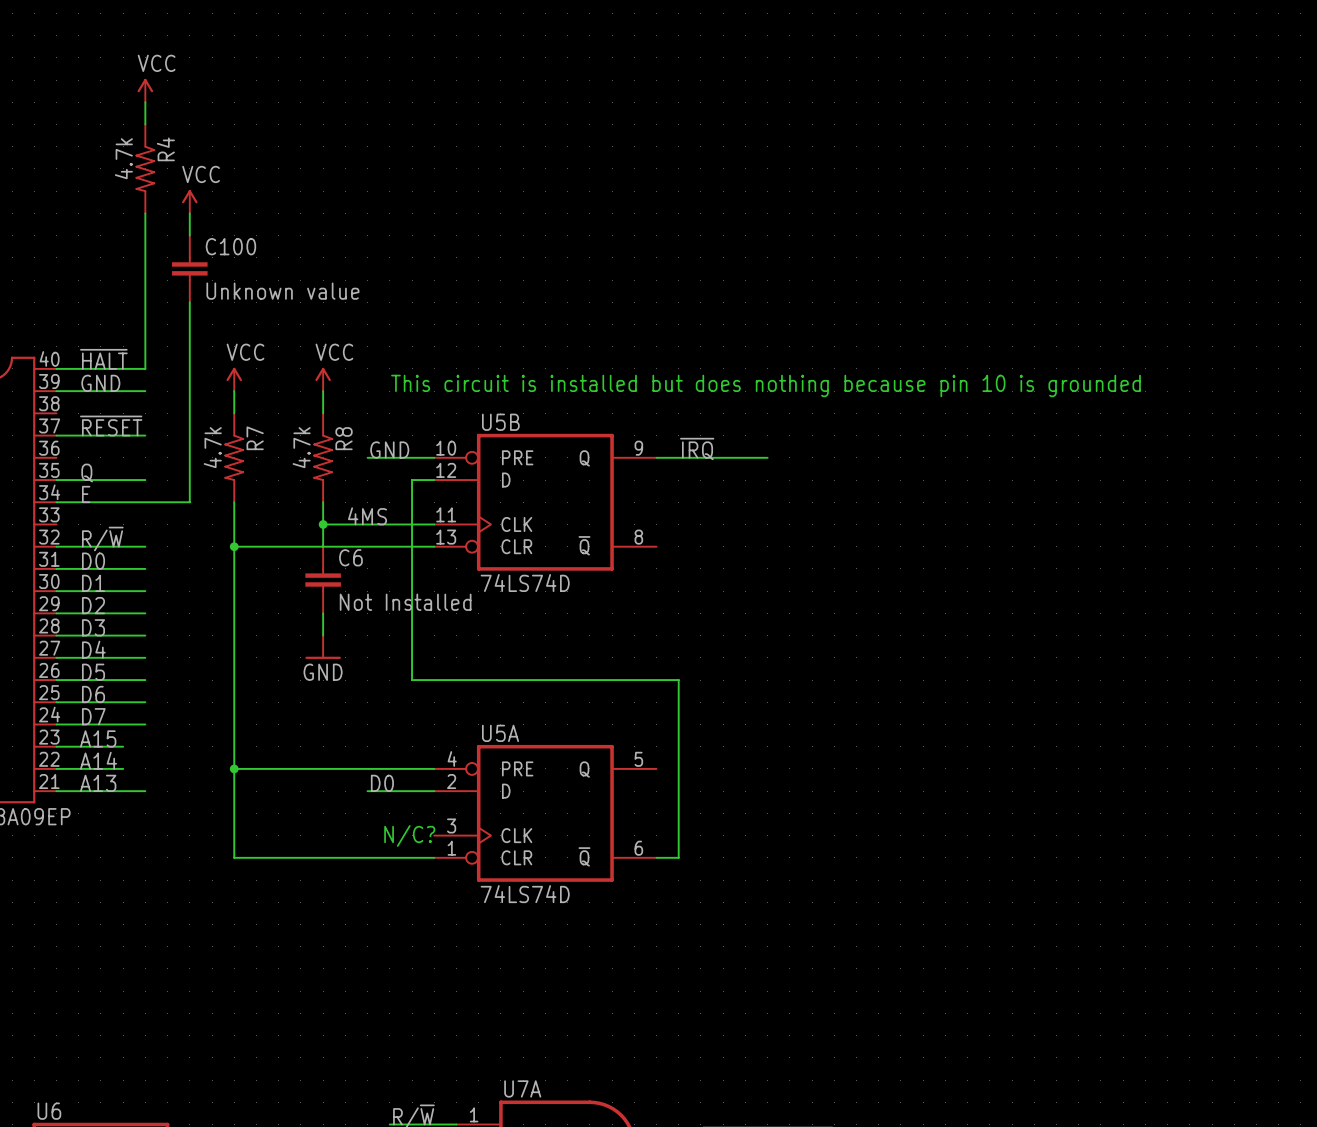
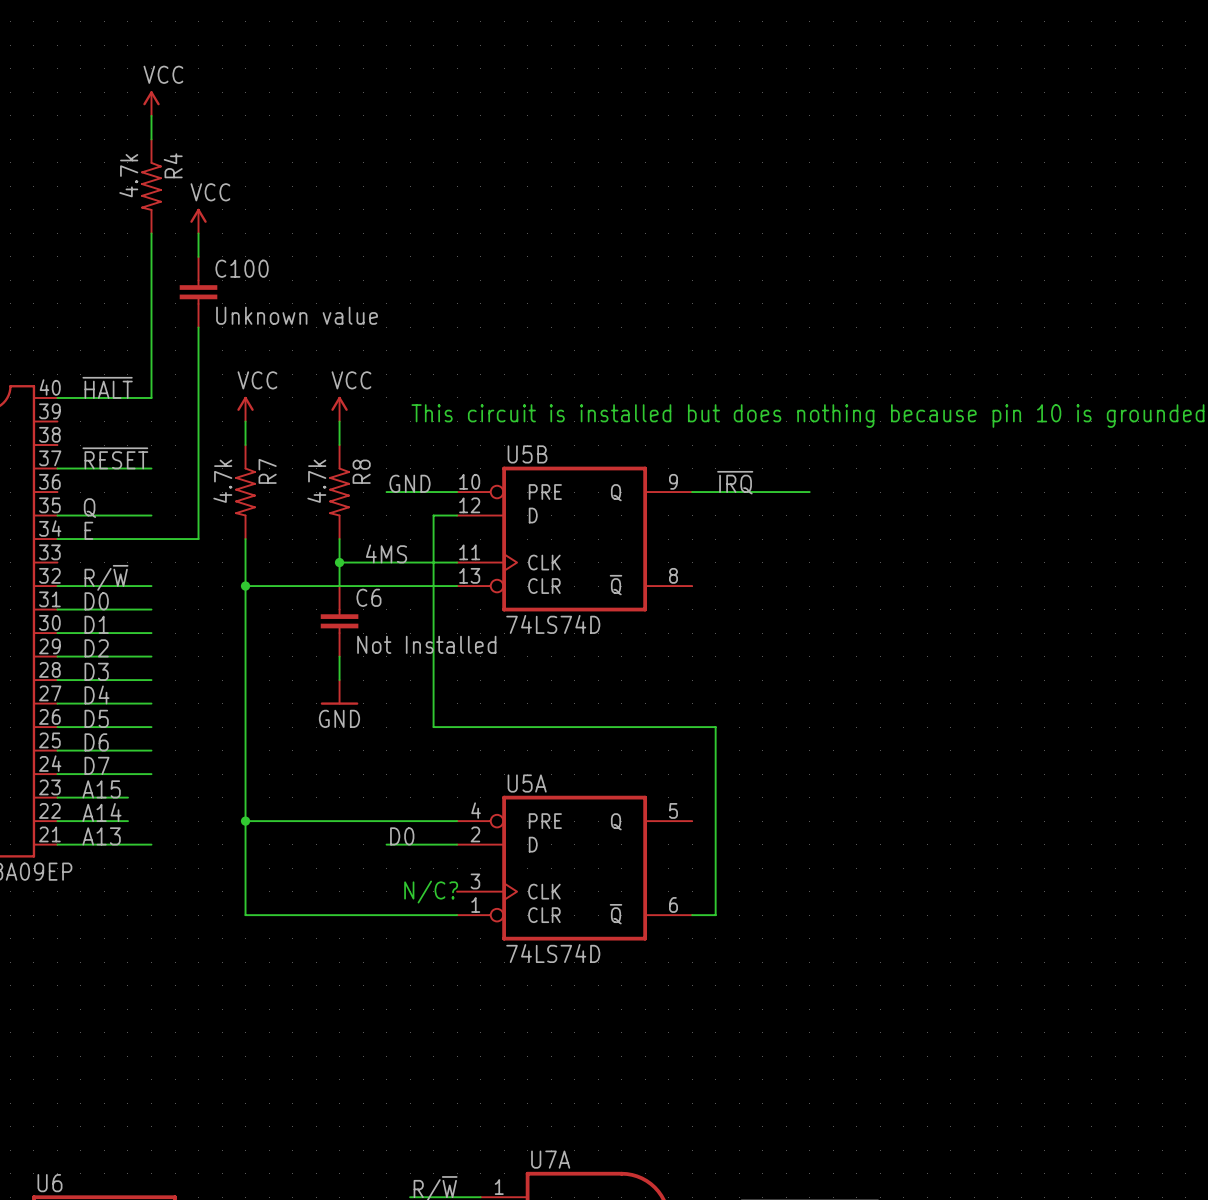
label: GND (100, 383) -> none
wire: (56, 391) (145, 391) -> none

